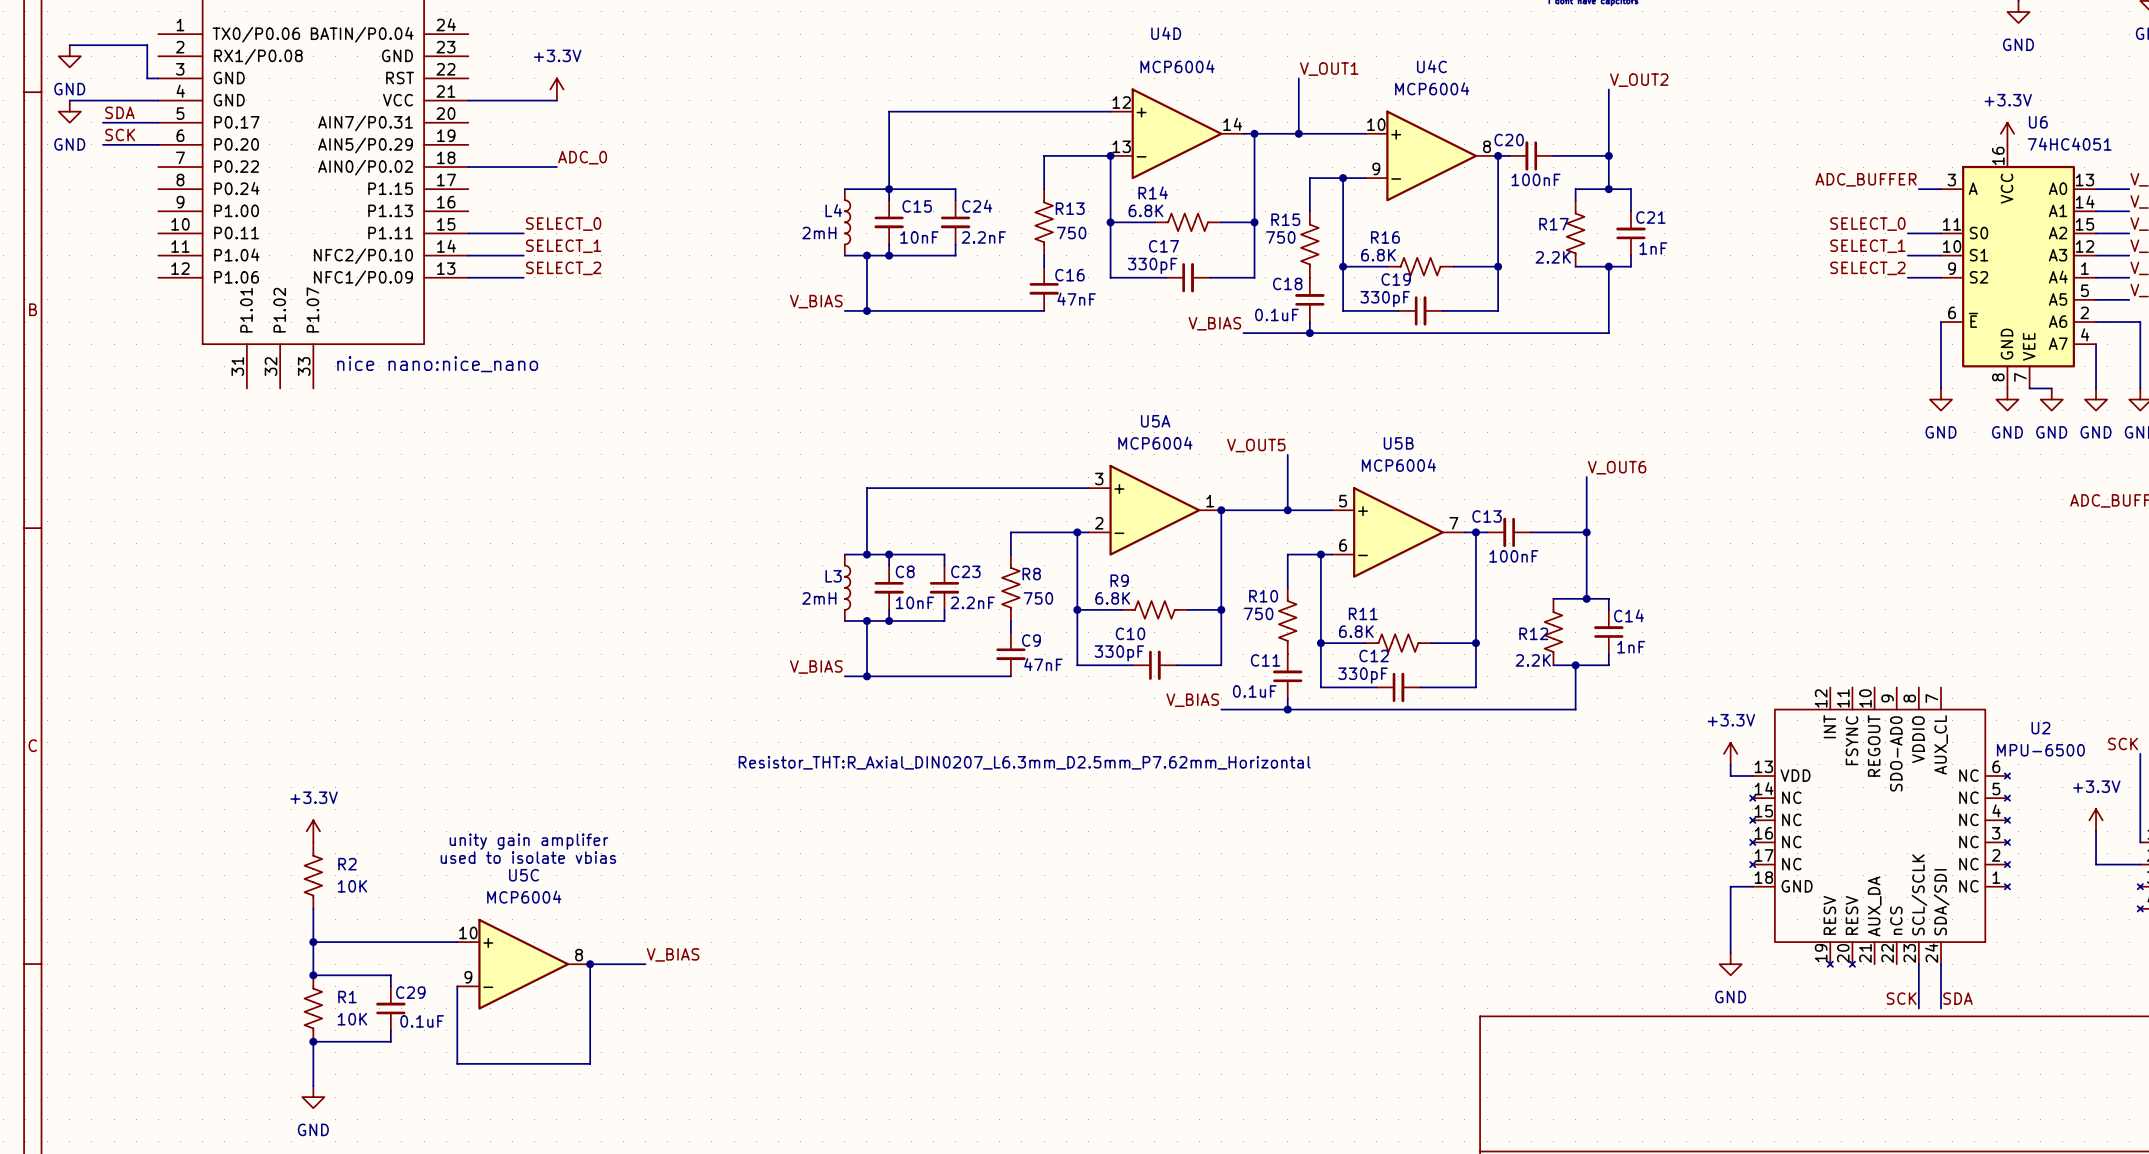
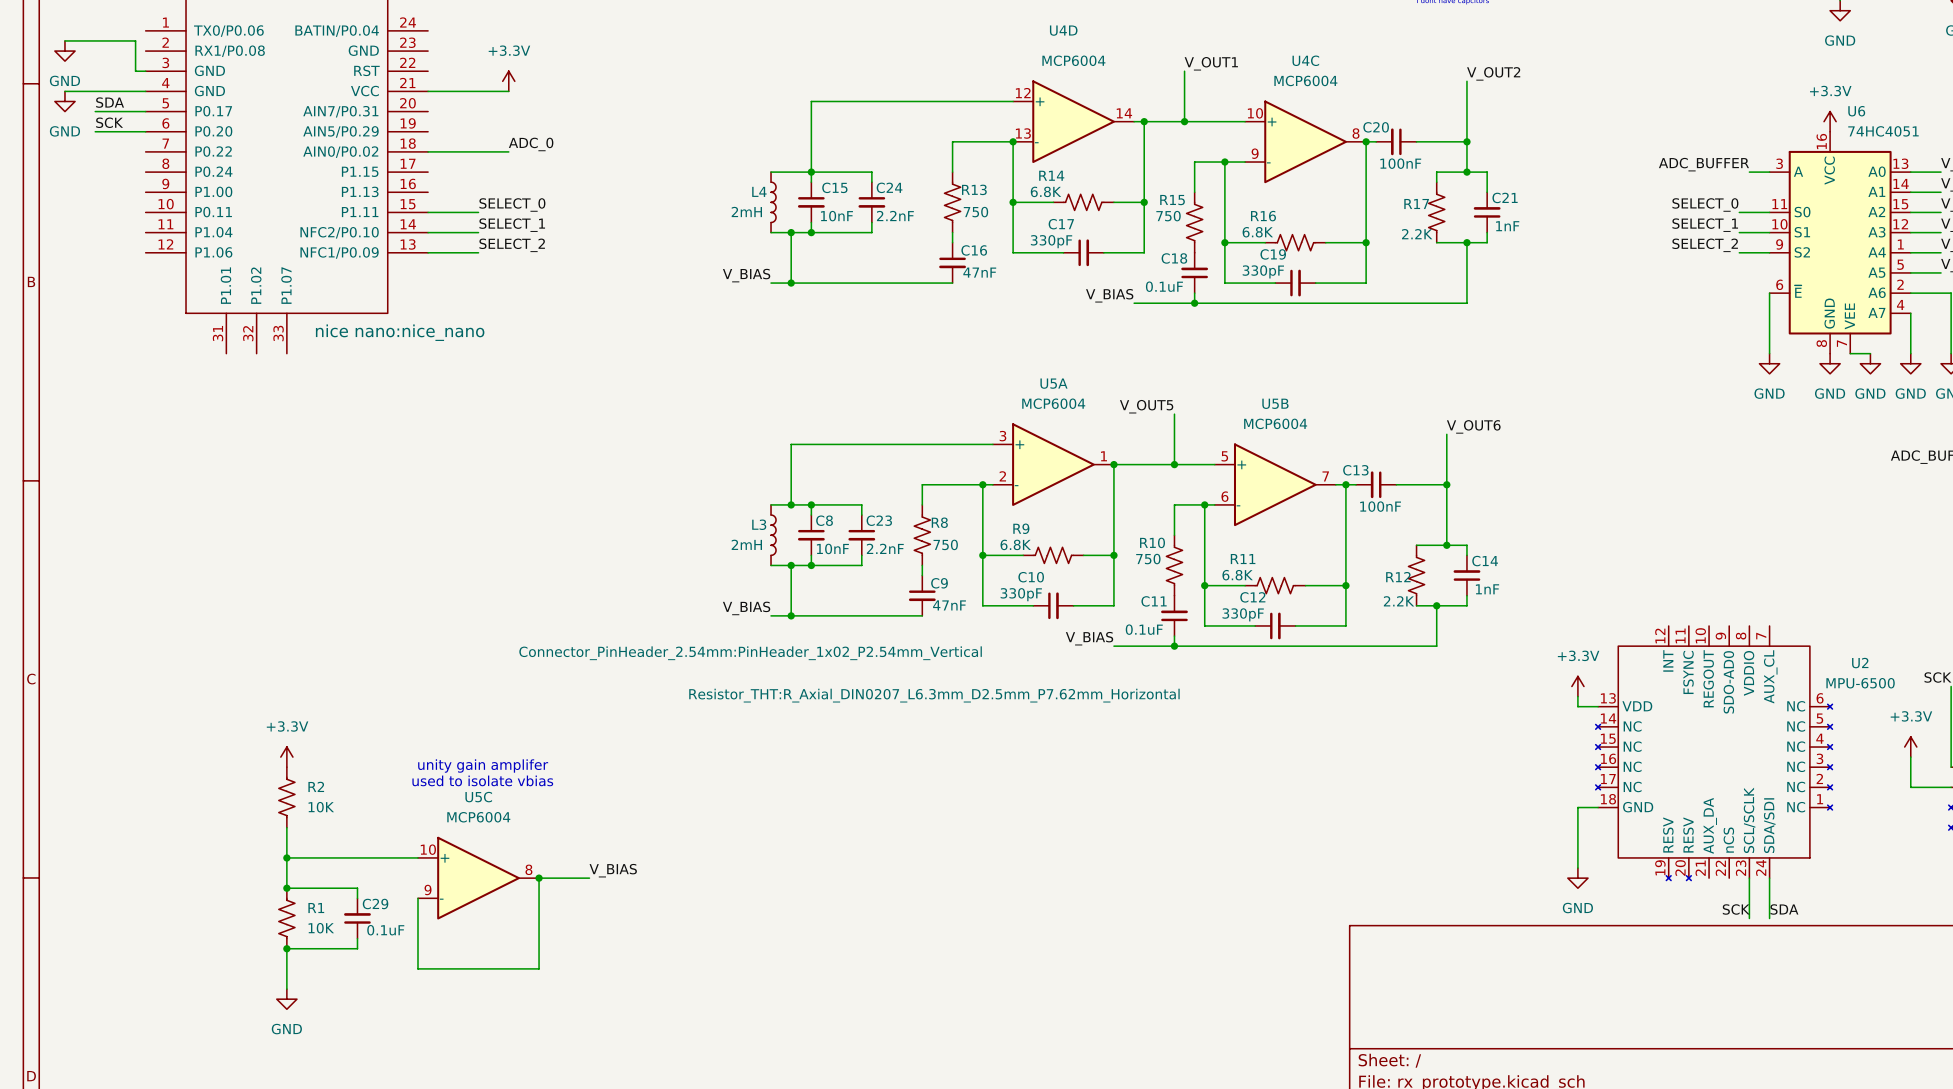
L3 text: none -> Connector_PinHeader_2.54mm:PinHeader_1x02_P2.54mm_Vertical (750, 653)

